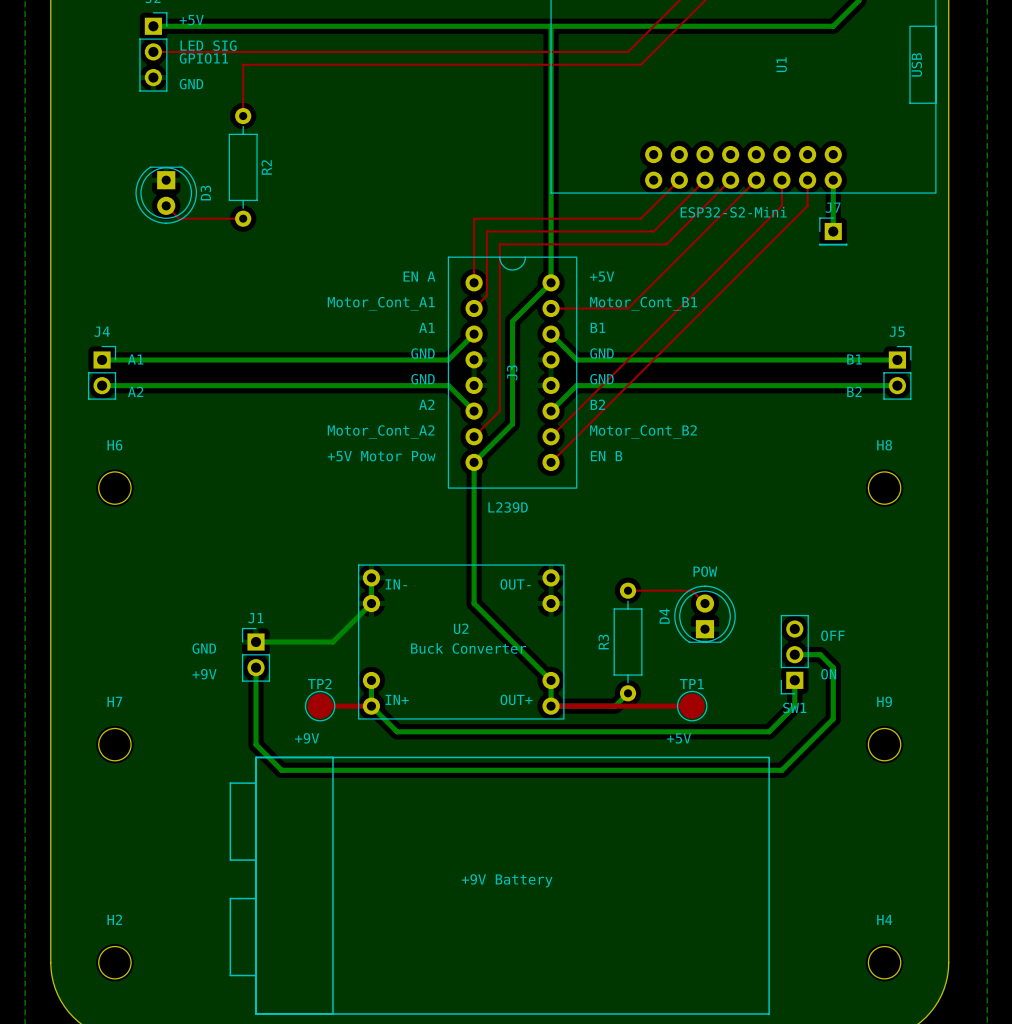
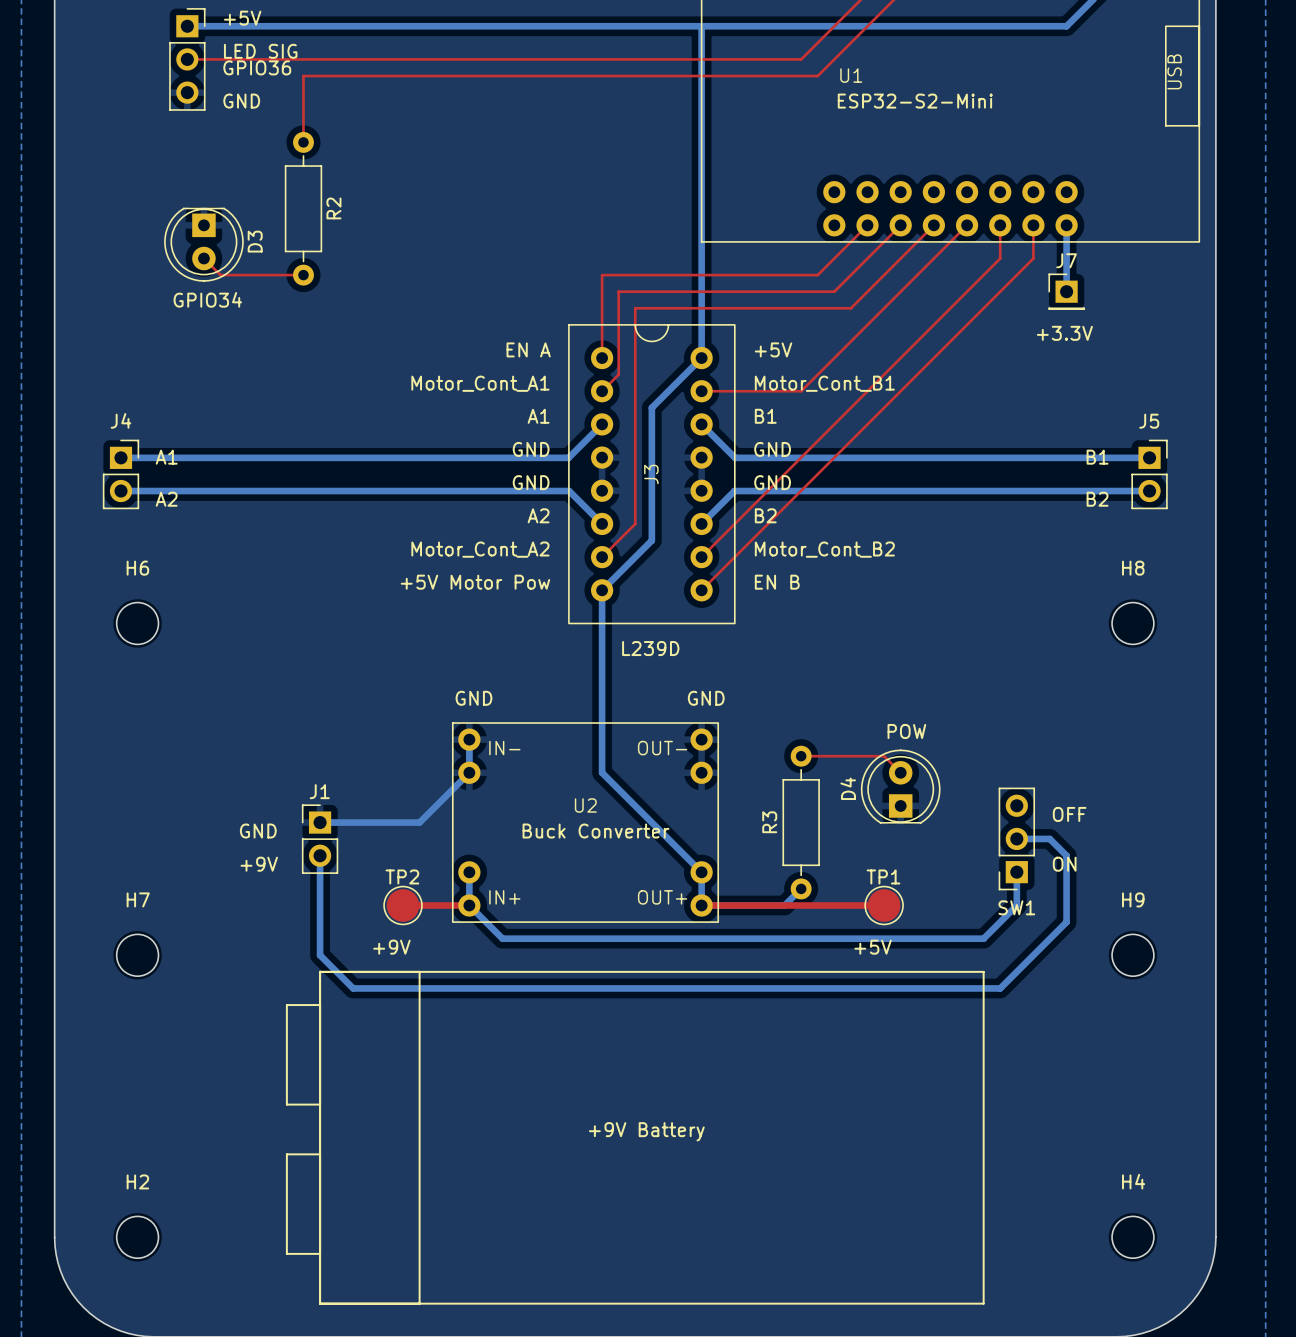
text: GPIO11 (203, 58) -> GPIO36 (257, 67)
U1 name rotation: 0° (781, 64) -> 90° clockwise (851, 75)
U1 name position: U1 (781, 64) -> U1 (851, 75)
text position: ESP32-S2-Mini (733, 212) -> ESP32-S2-Mini (915, 101)
text: none -> GPIO34 (207, 299)
text: none -> +3.3V (1064, 333)
text: none -> GND (473, 698)
text: none -> GND (706, 698)

